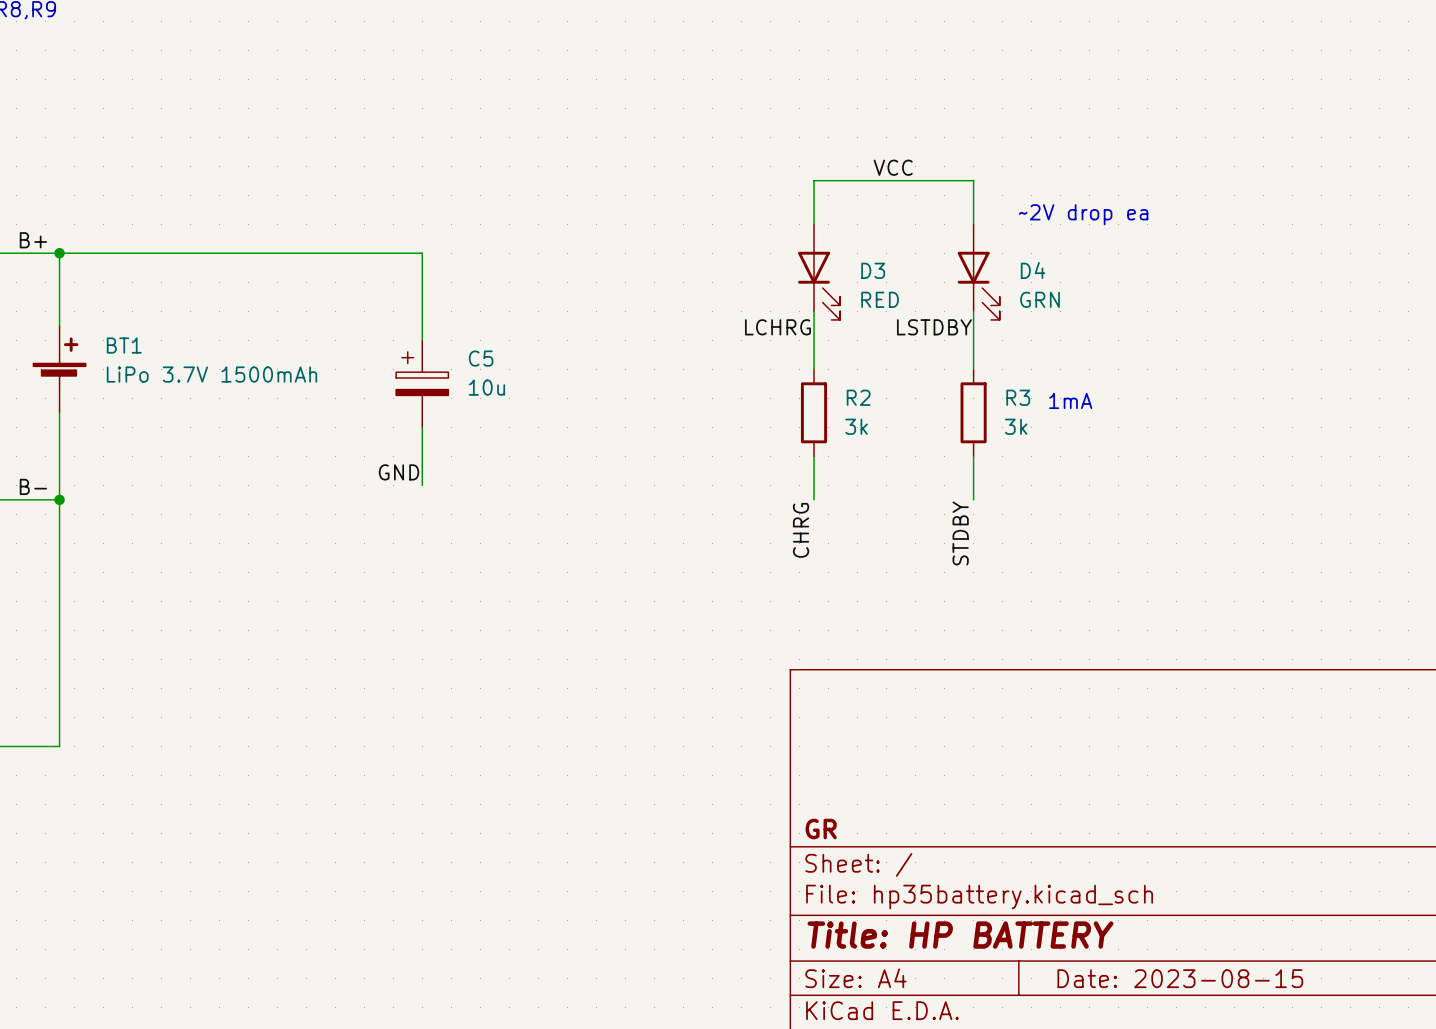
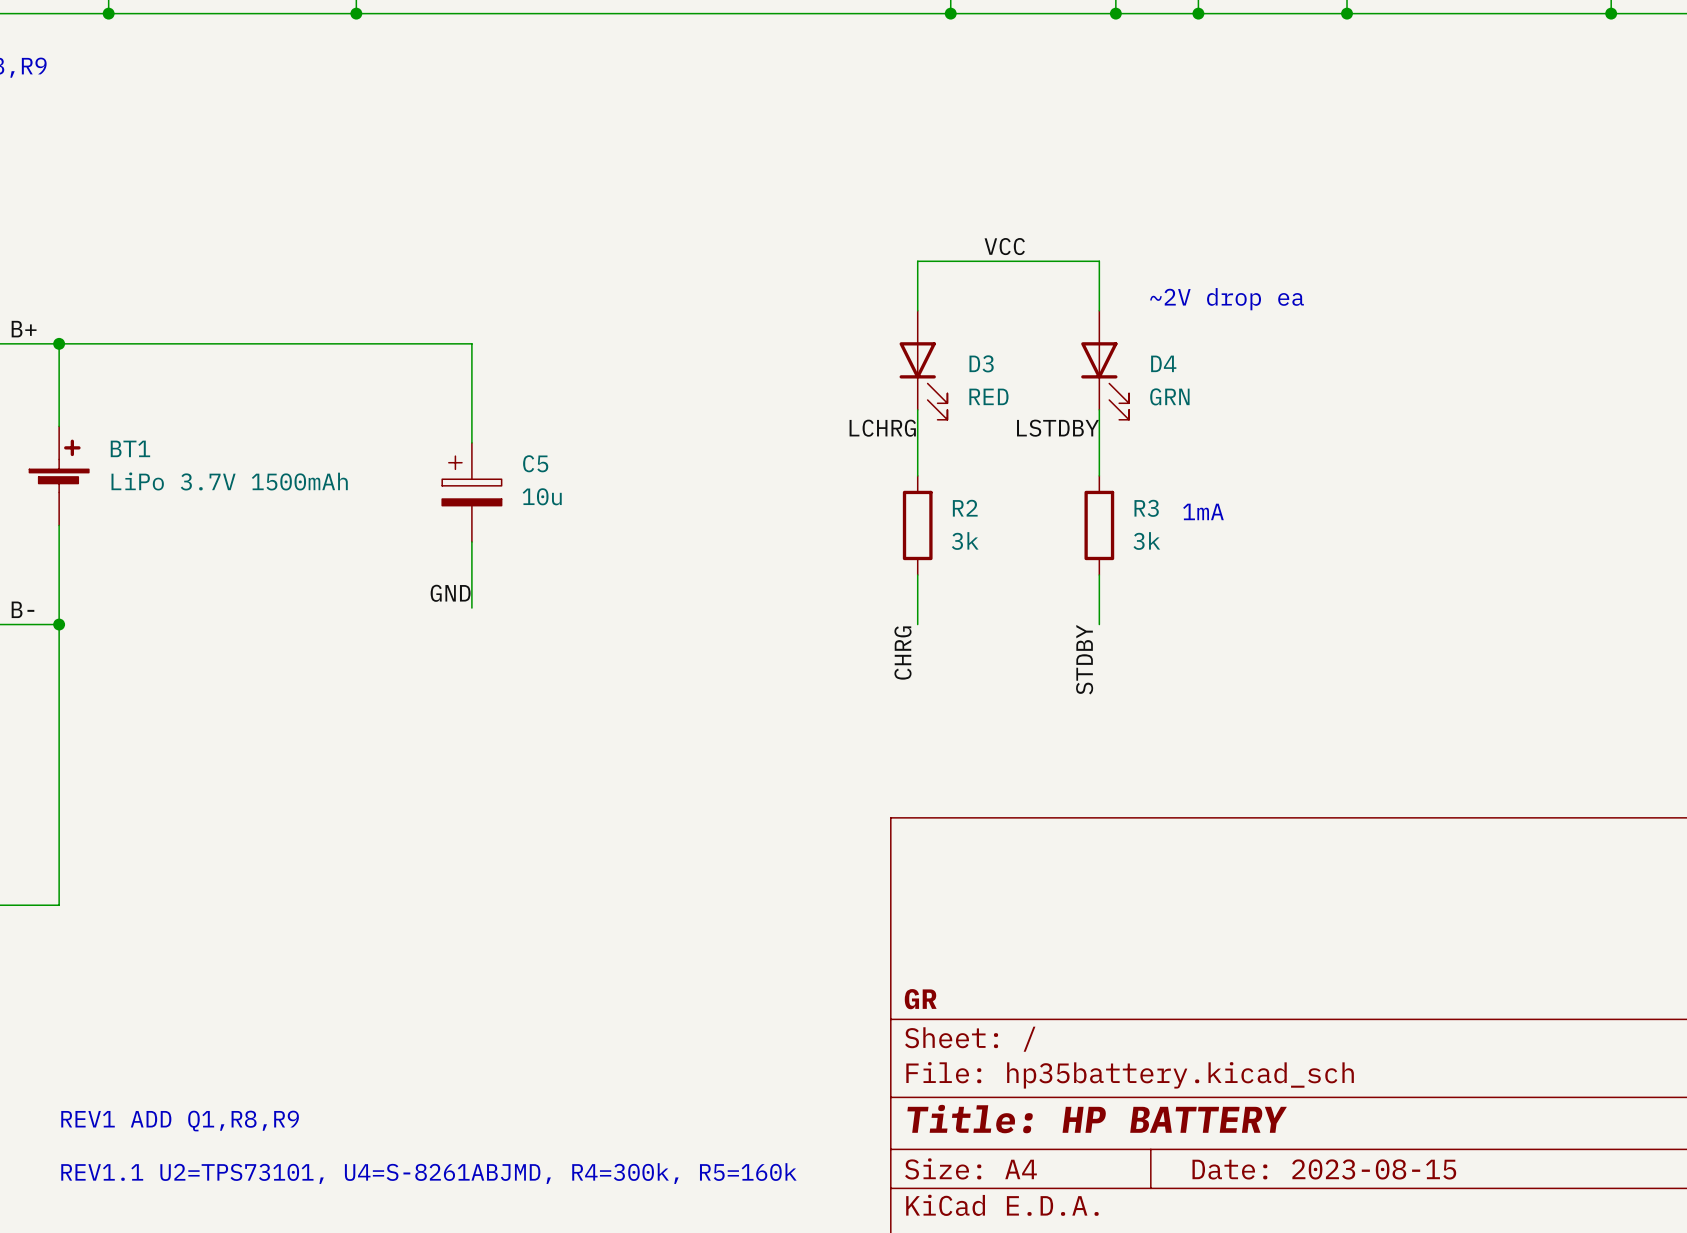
text: none -> REV1 ADD Q1,R8,R9 (180, 1121)
text: none -> REV1.1 U2=TPS73101, U4=S-8261ABJMD, R4=300k, R5=160k (428, 1173)

